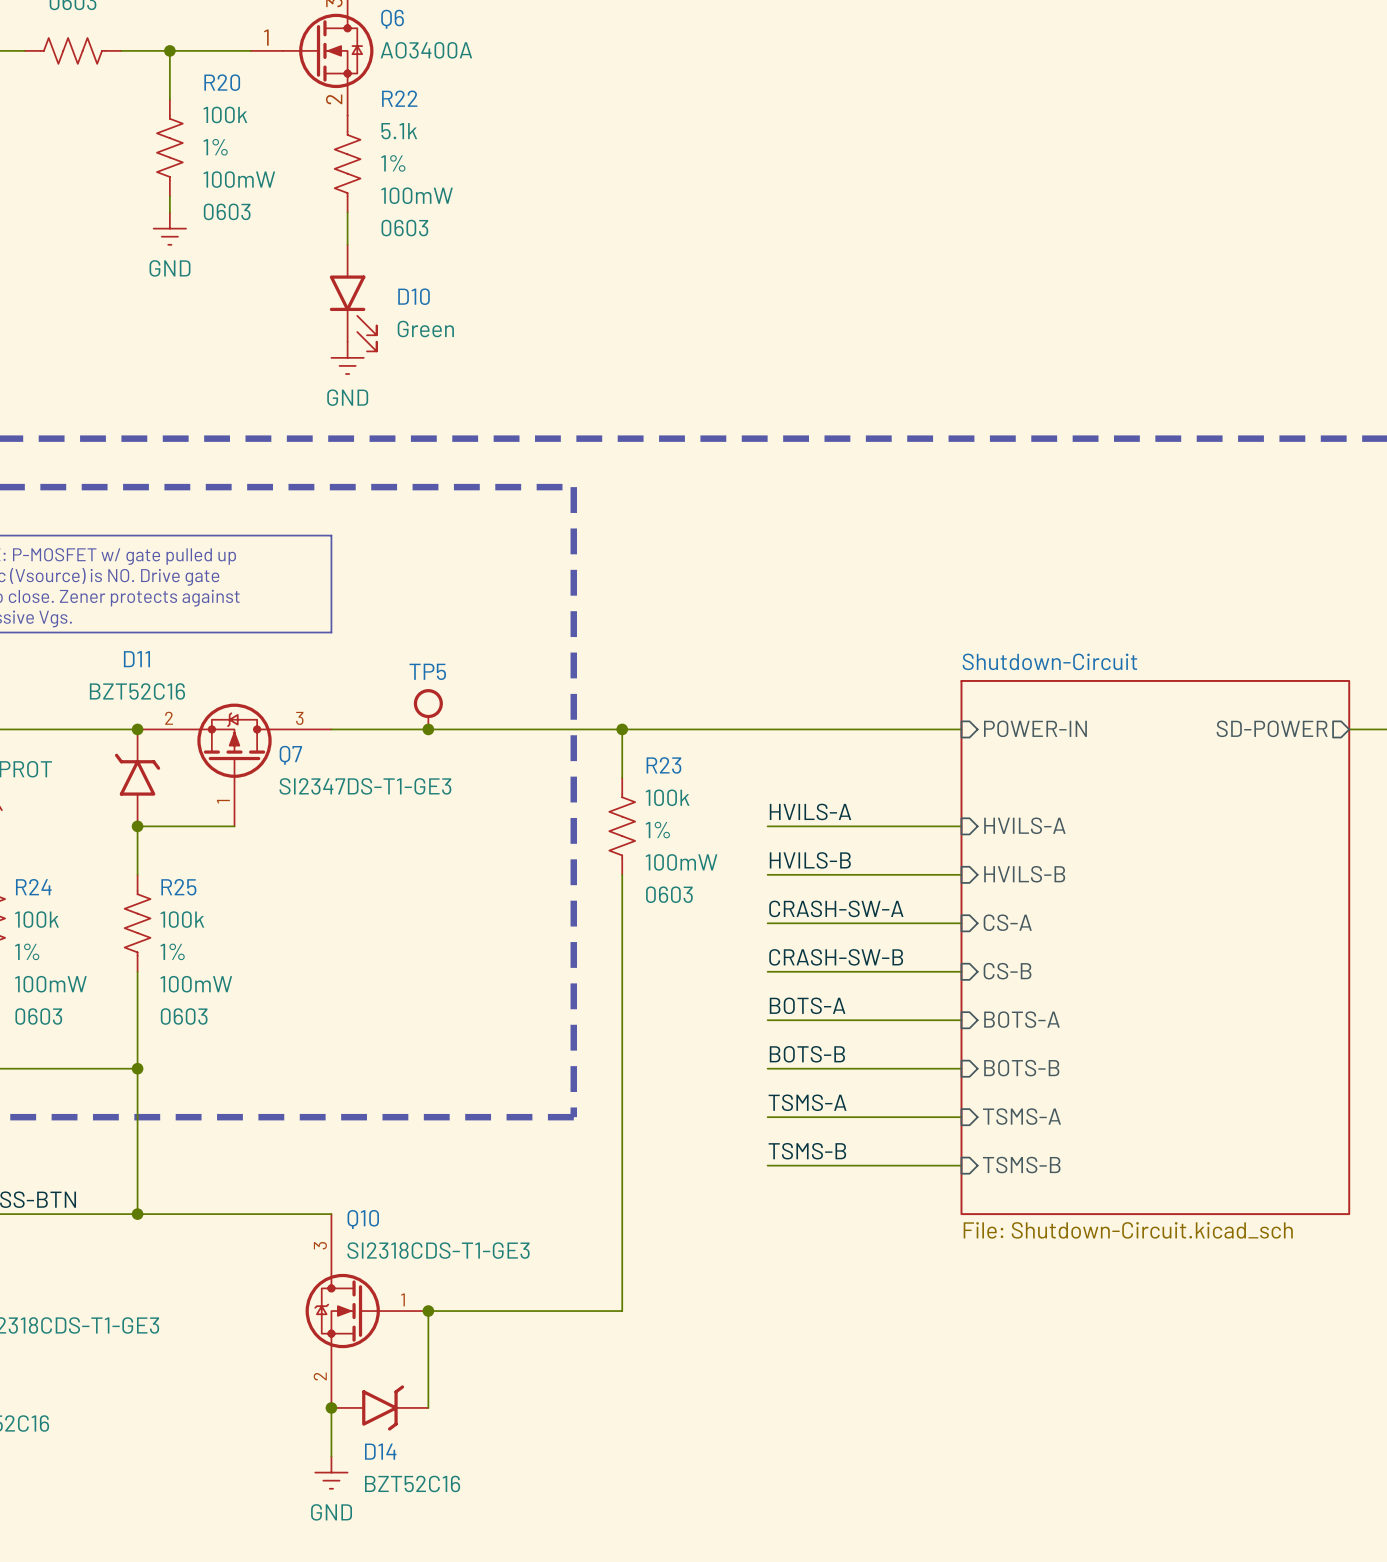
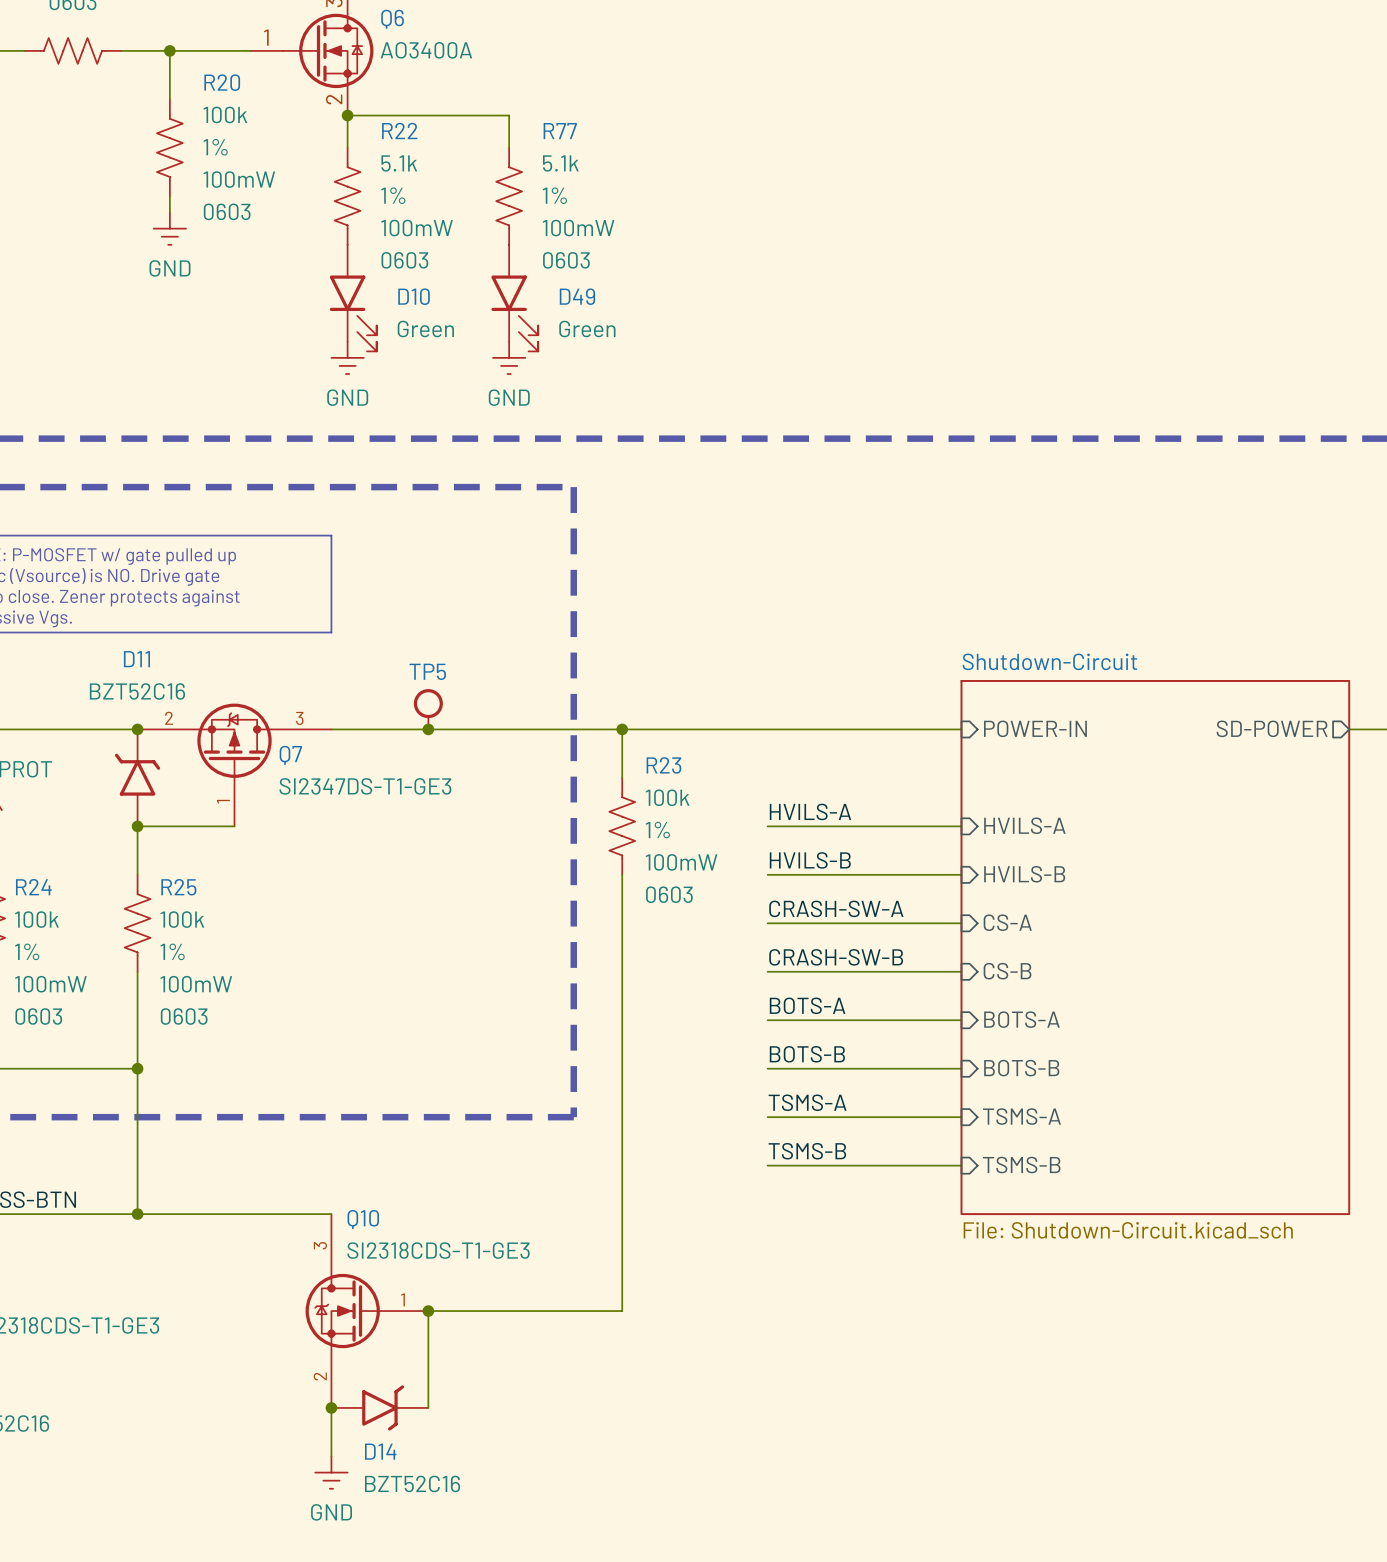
junction: none -> (347, 115)
wire: none -> (347, 147) (347, 115) (509, 115) (509, 147)
R22 position: (347, 164) -> (347, 196)
R77: none -> 5.1k (509, 196)
D49: none -> Green (514, 298)
power symbol: none -> GND (509, 357)

